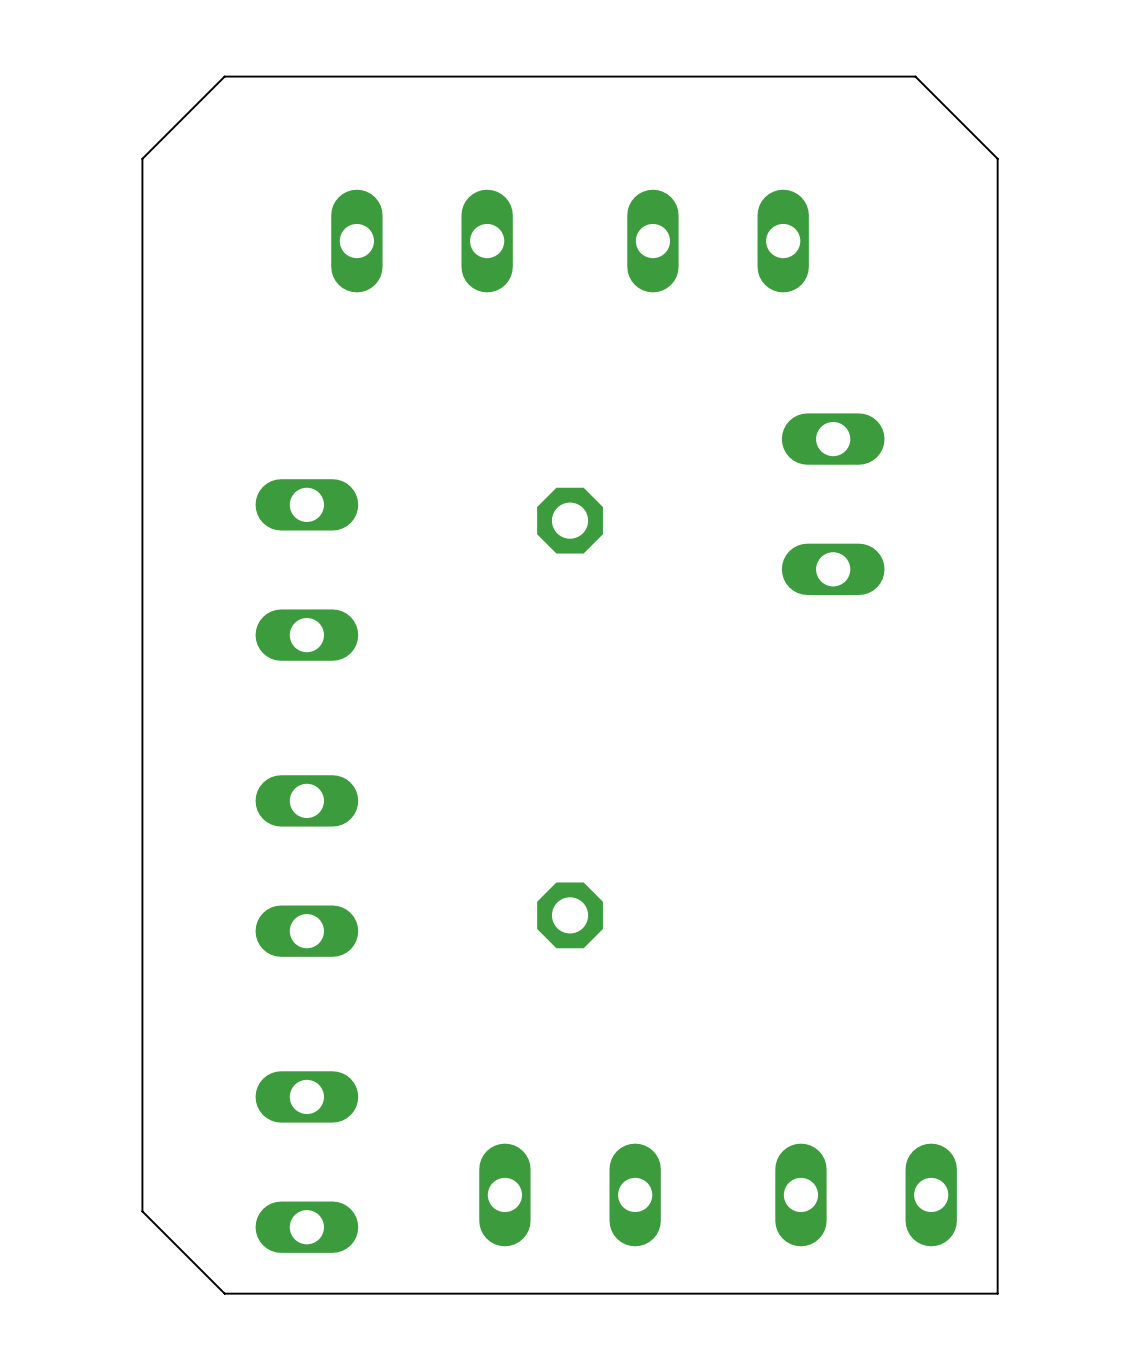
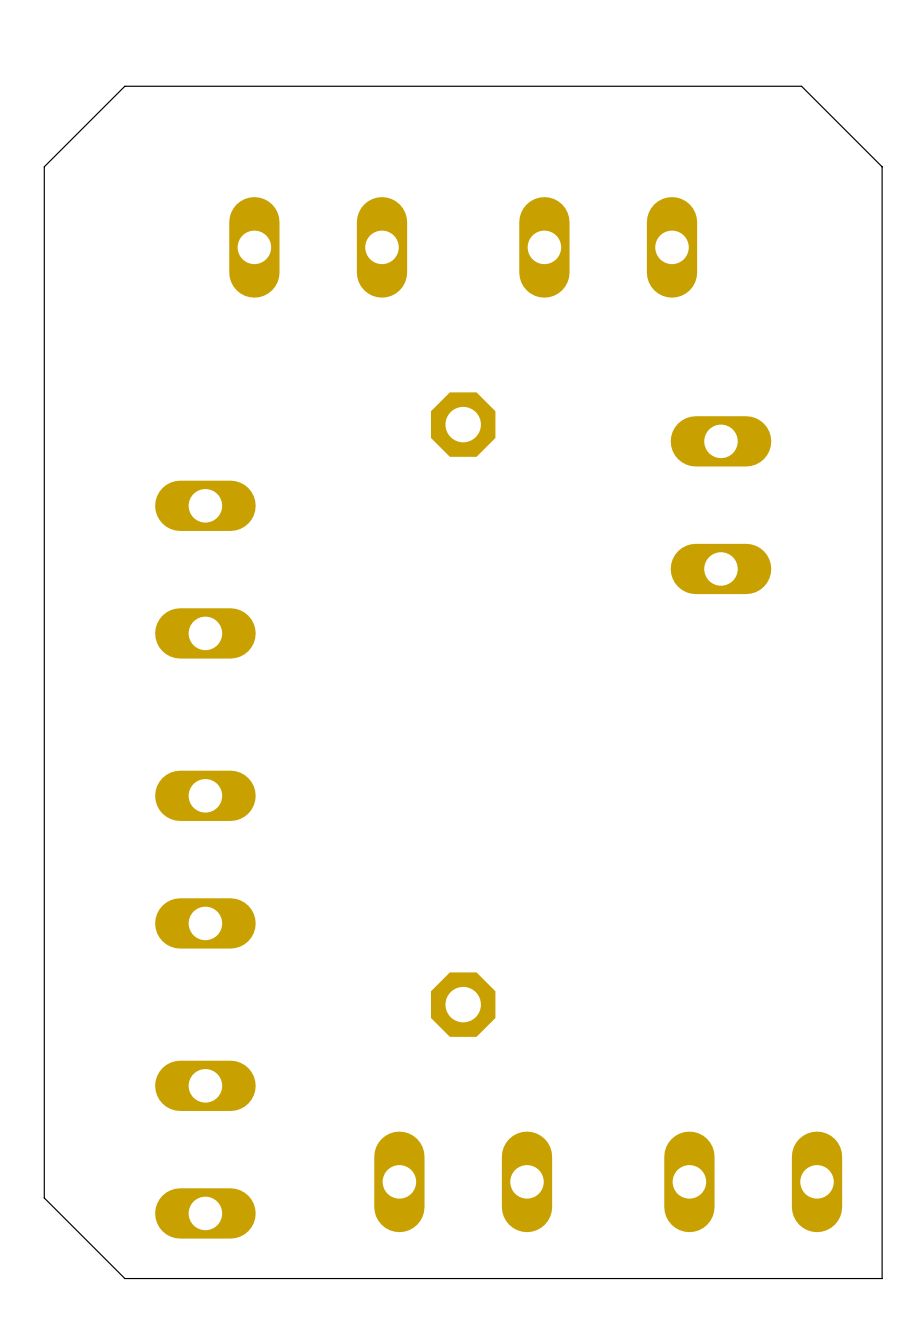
part position: (570, 520) -> (463, 424)
part position: (570, 915) -> (463, 1004)

